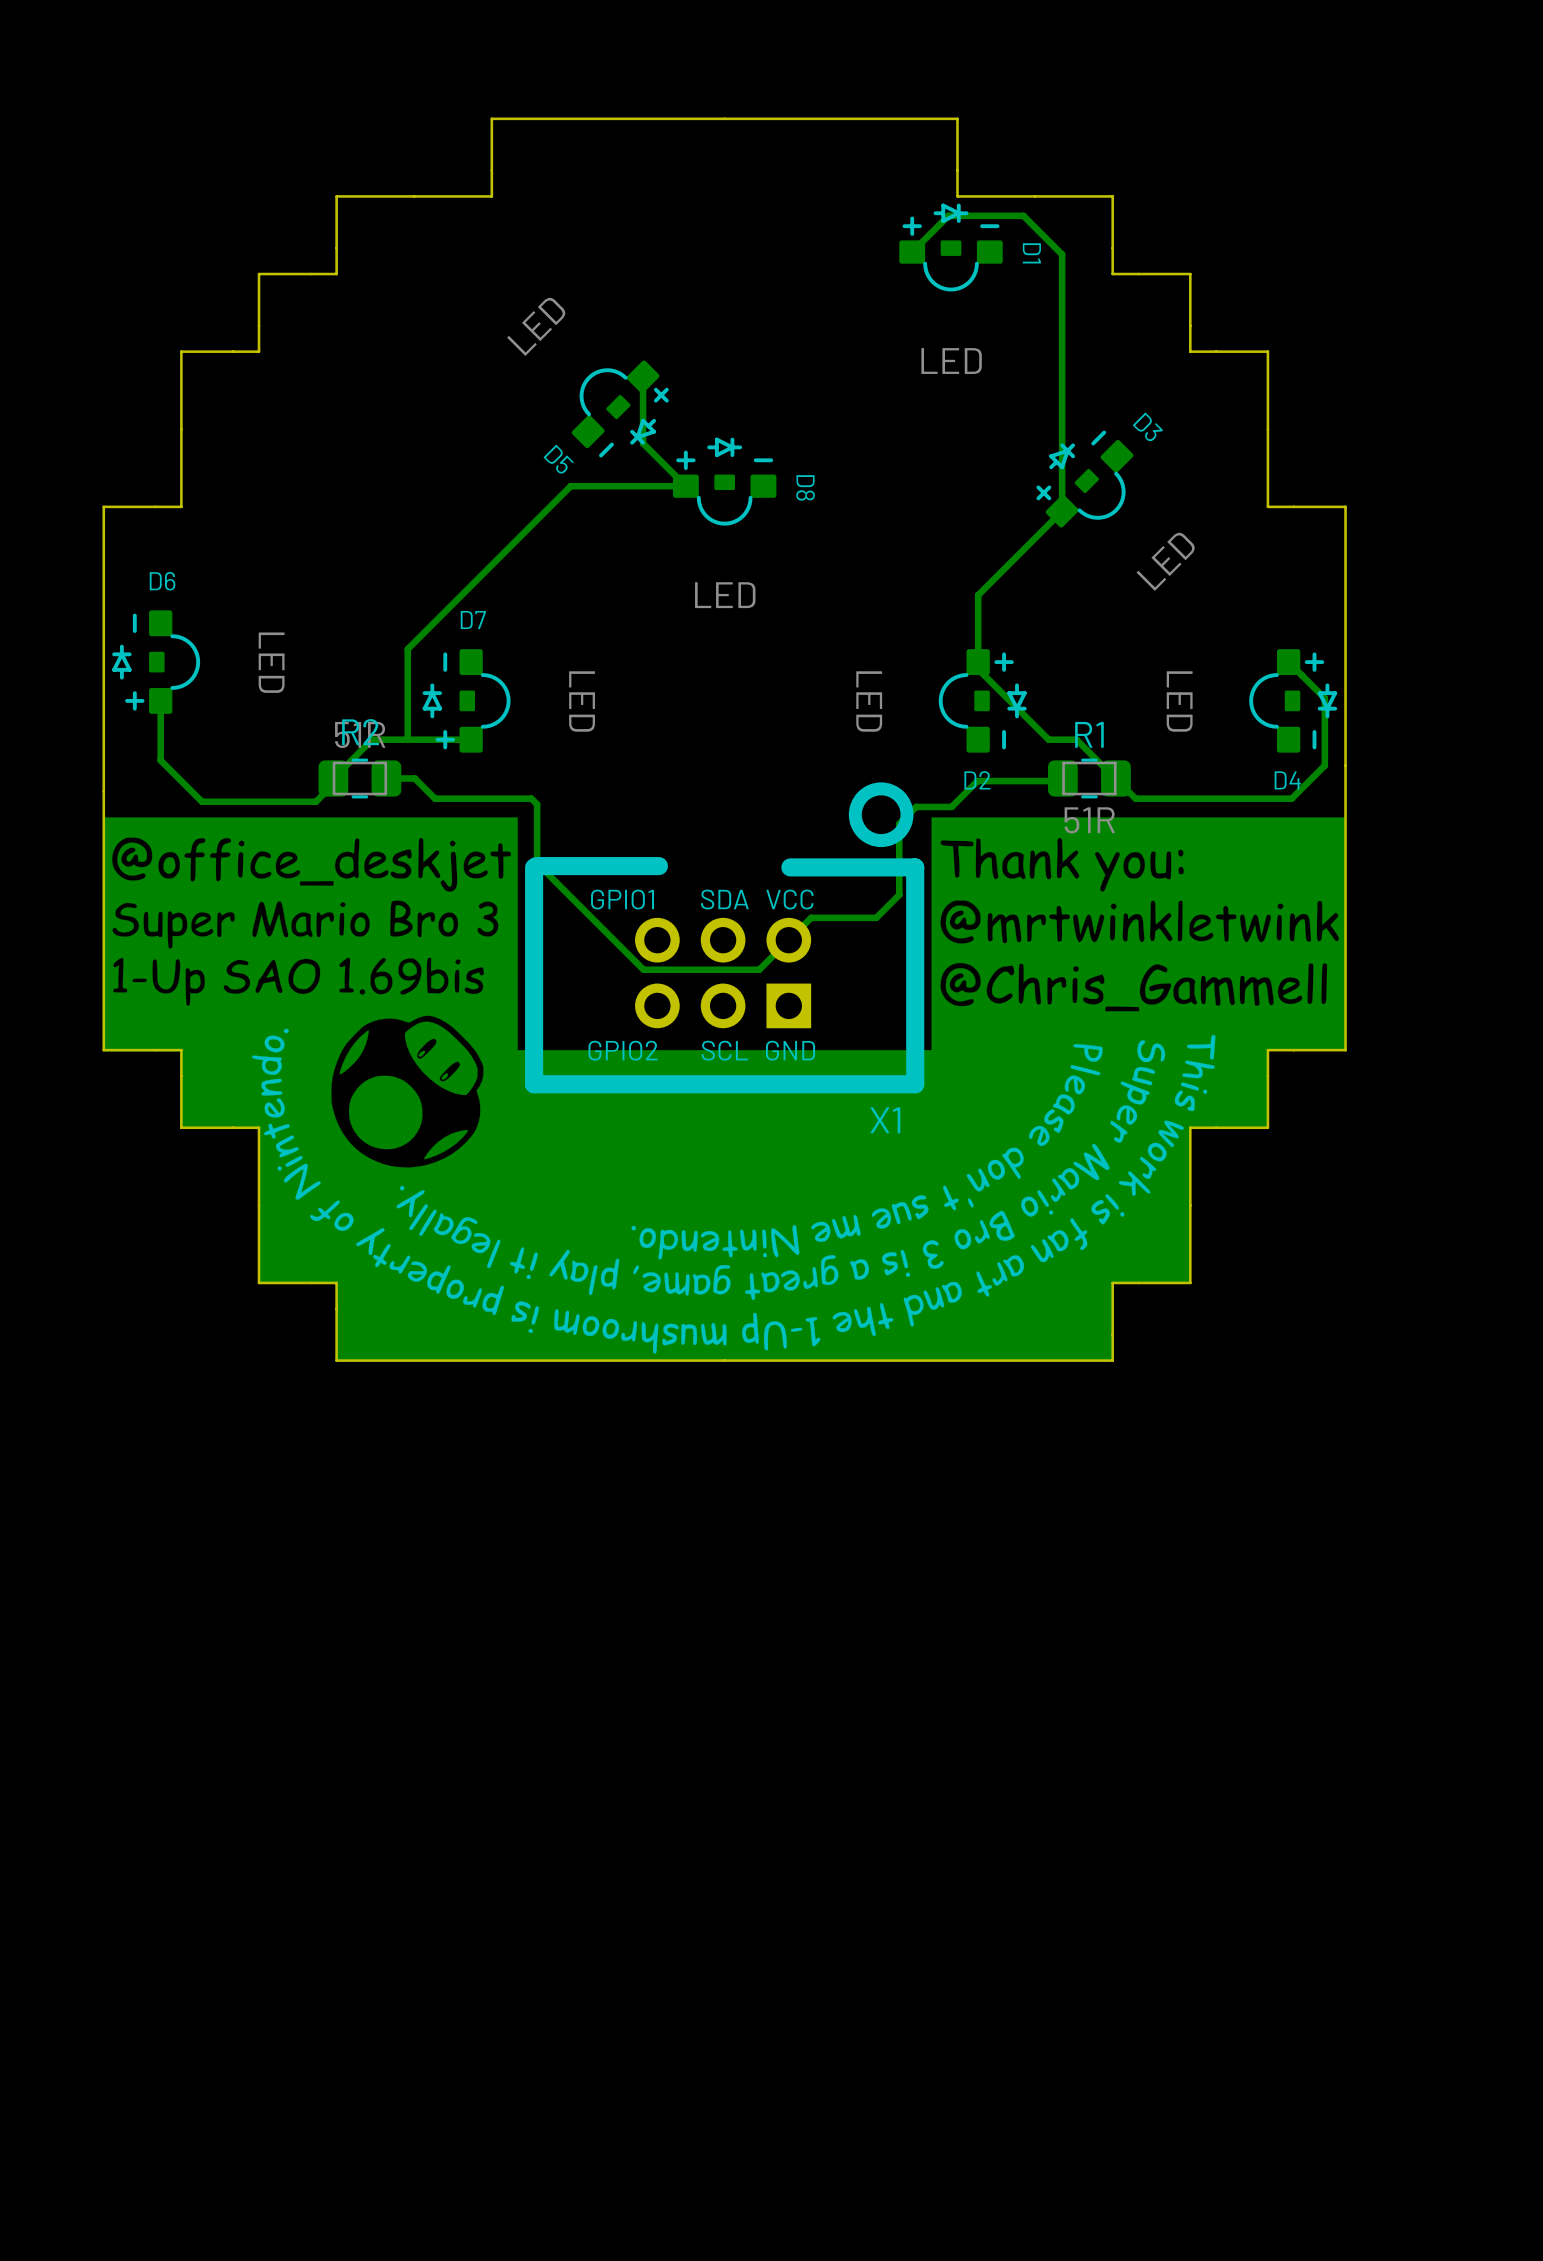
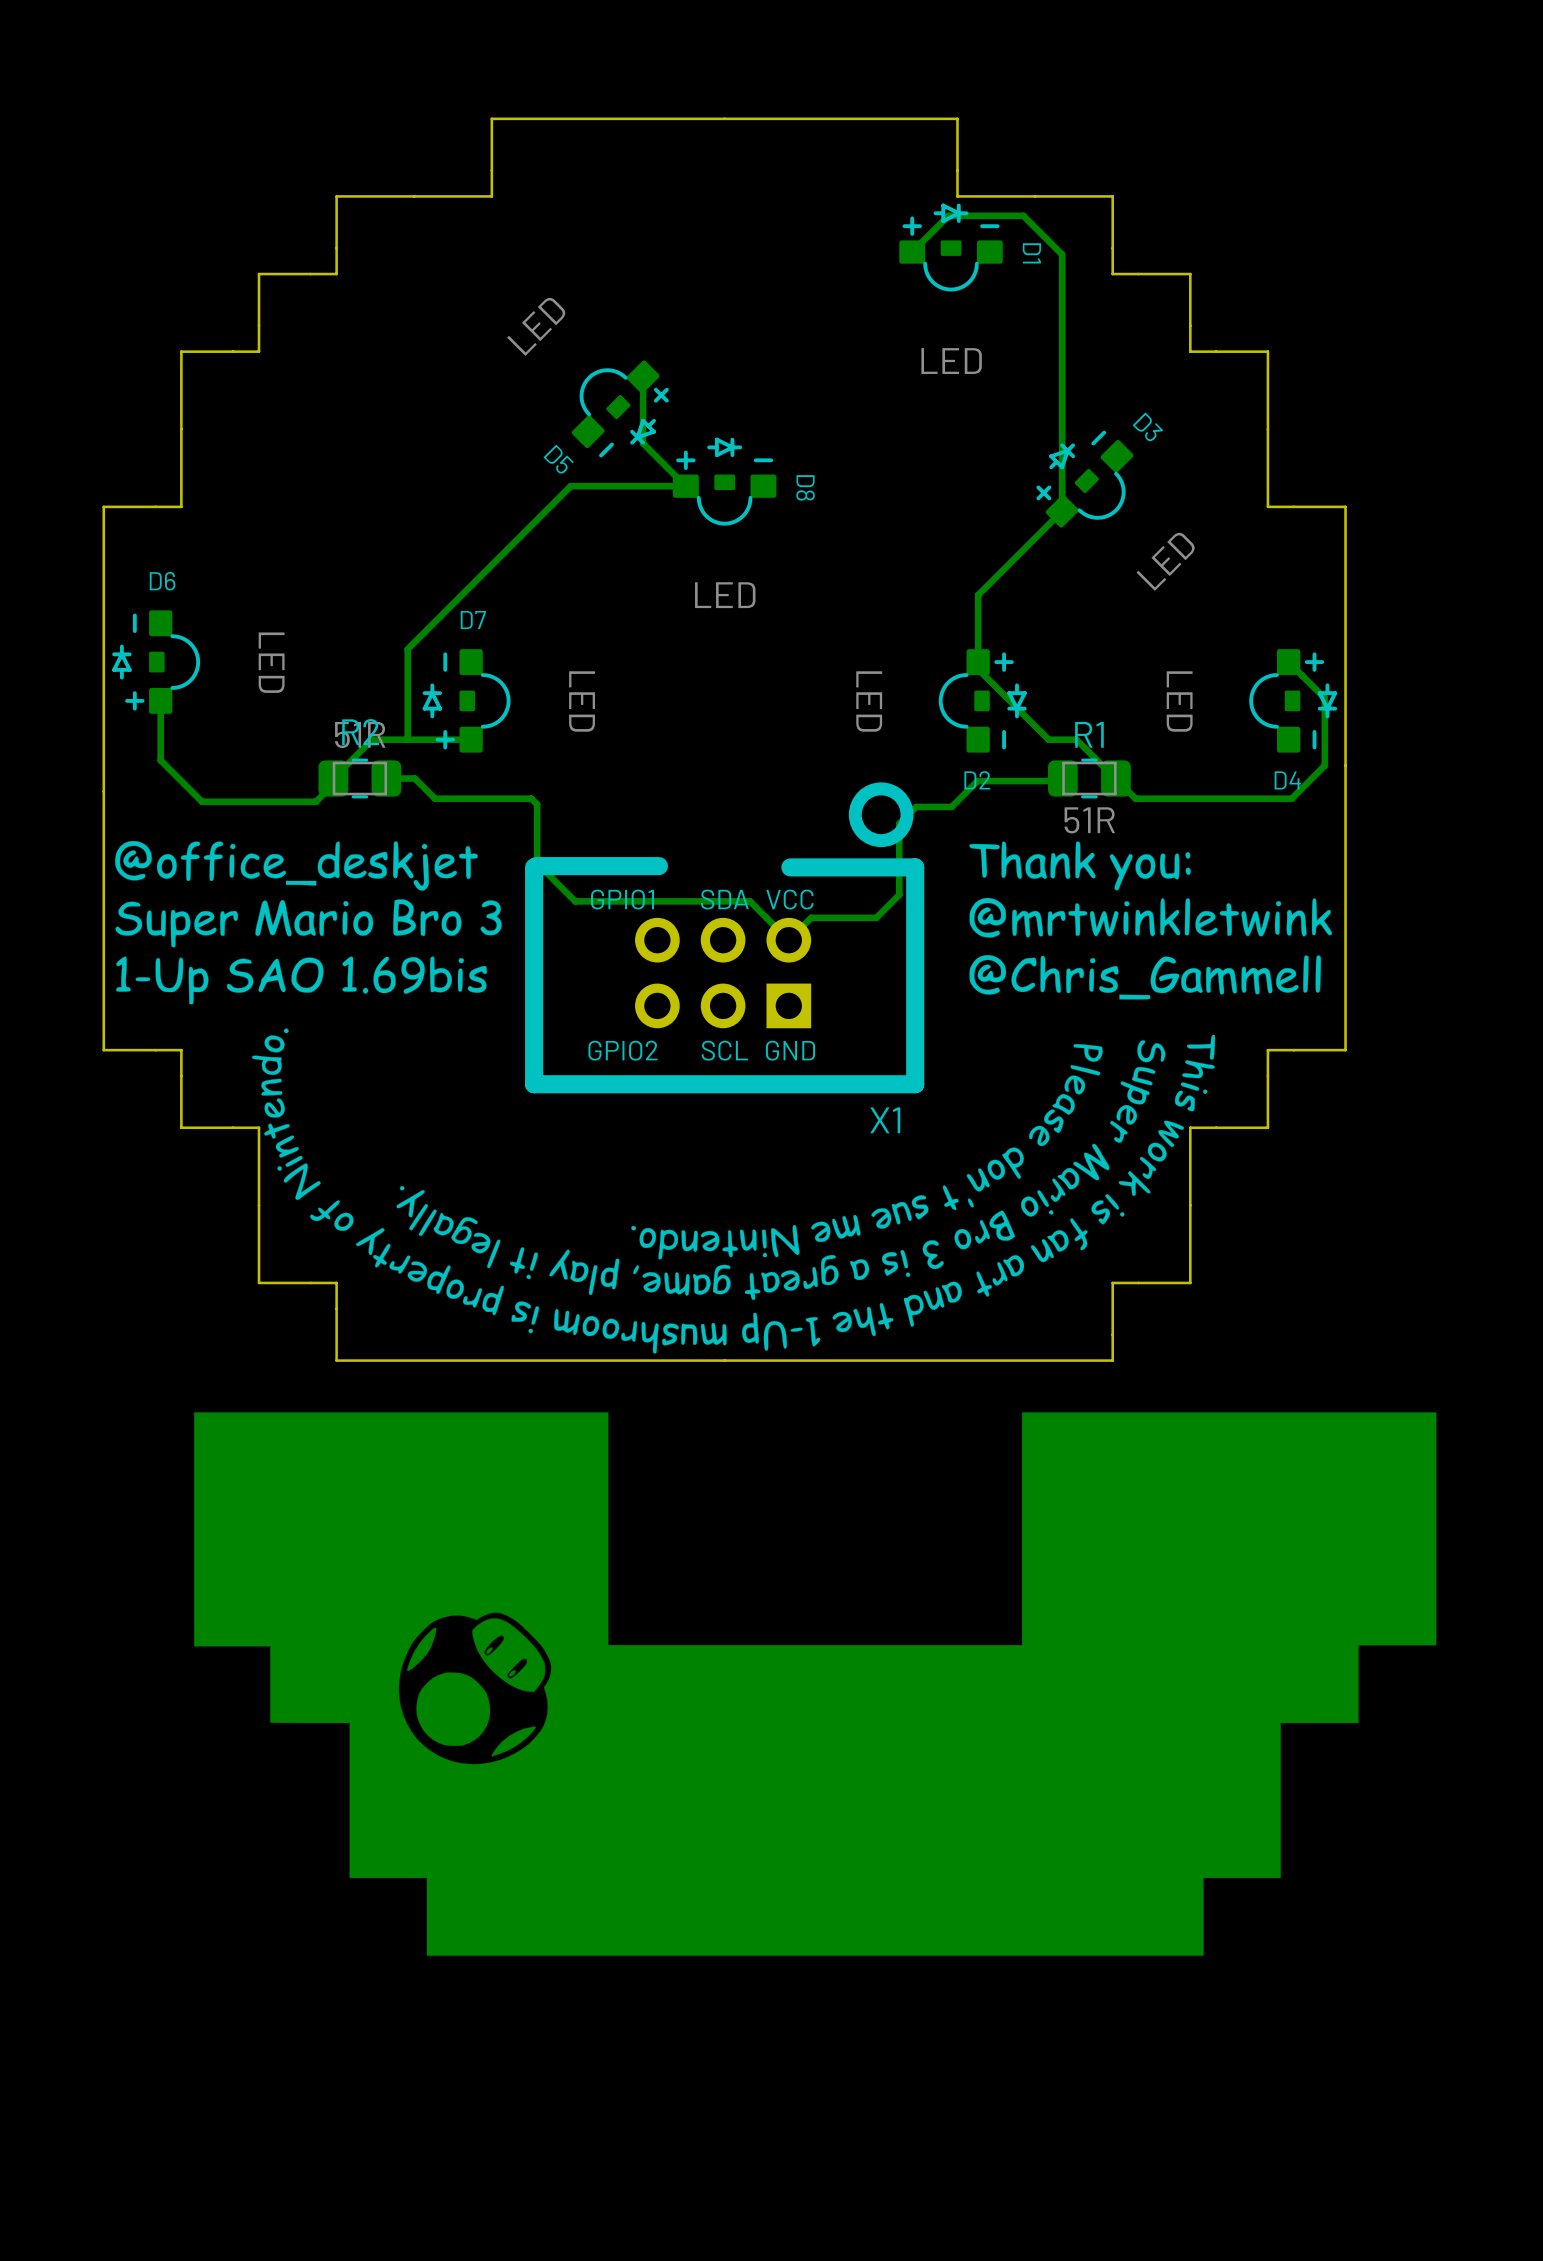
drawing shape: [103, 817, 1346, 1361] -> [115, 840, 1332, 1354]
track: (575, 901) (643, 969) (759, 969) (788, 940) -> (575, 901) (750, 901) (788, 940)
drawing: [252, 1028, 1216, 1354] -> none
drawing: none -> [194, 1412, 1437, 1956]

